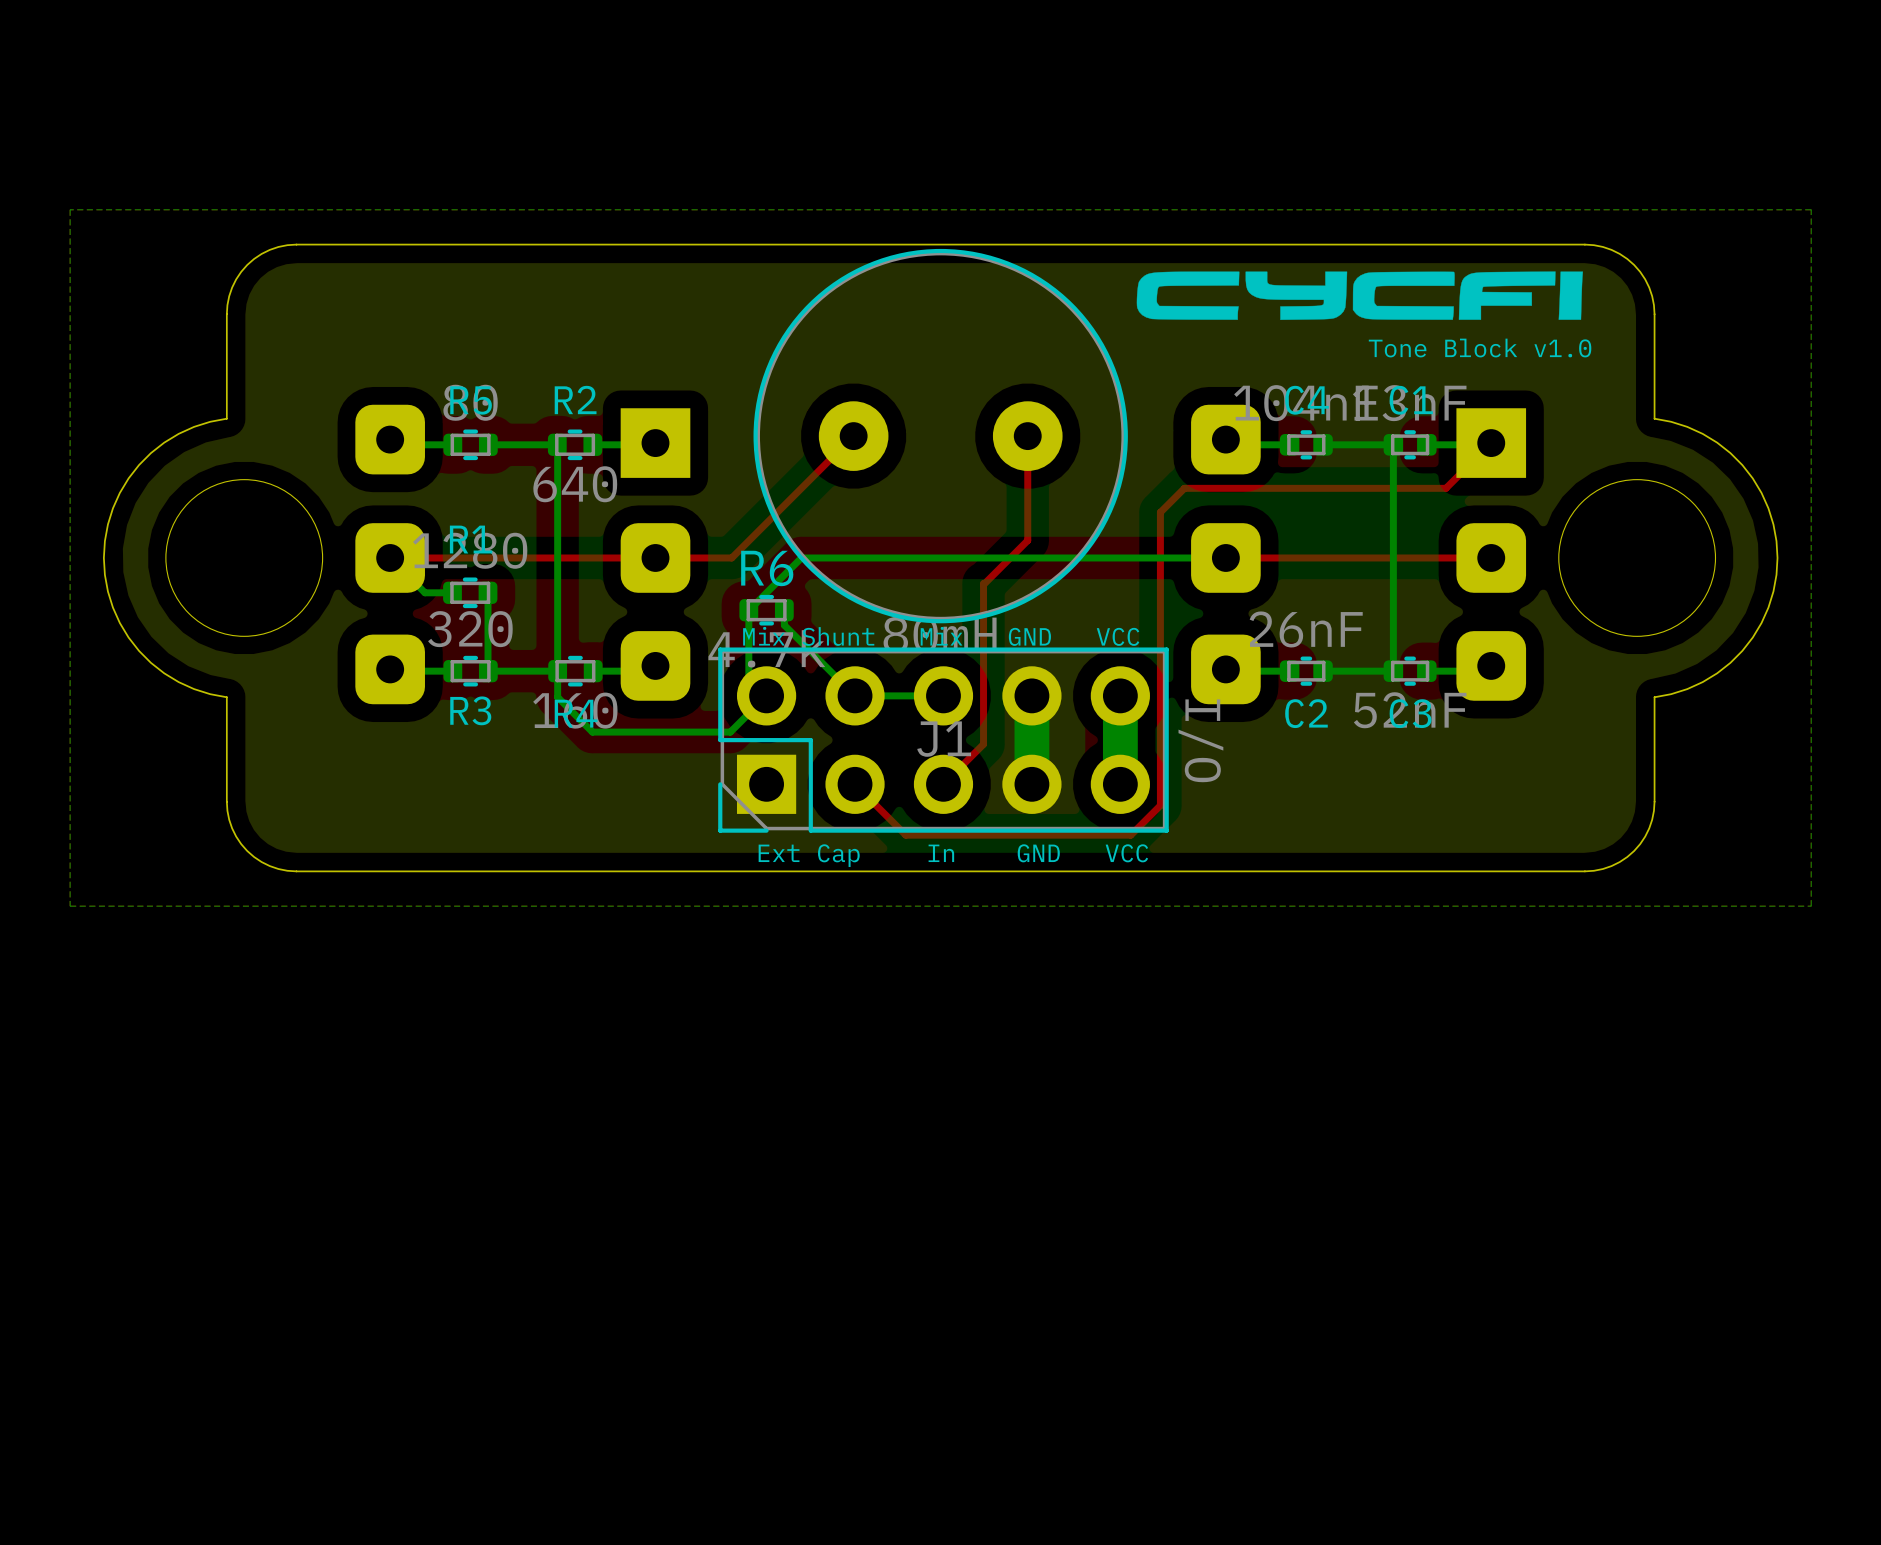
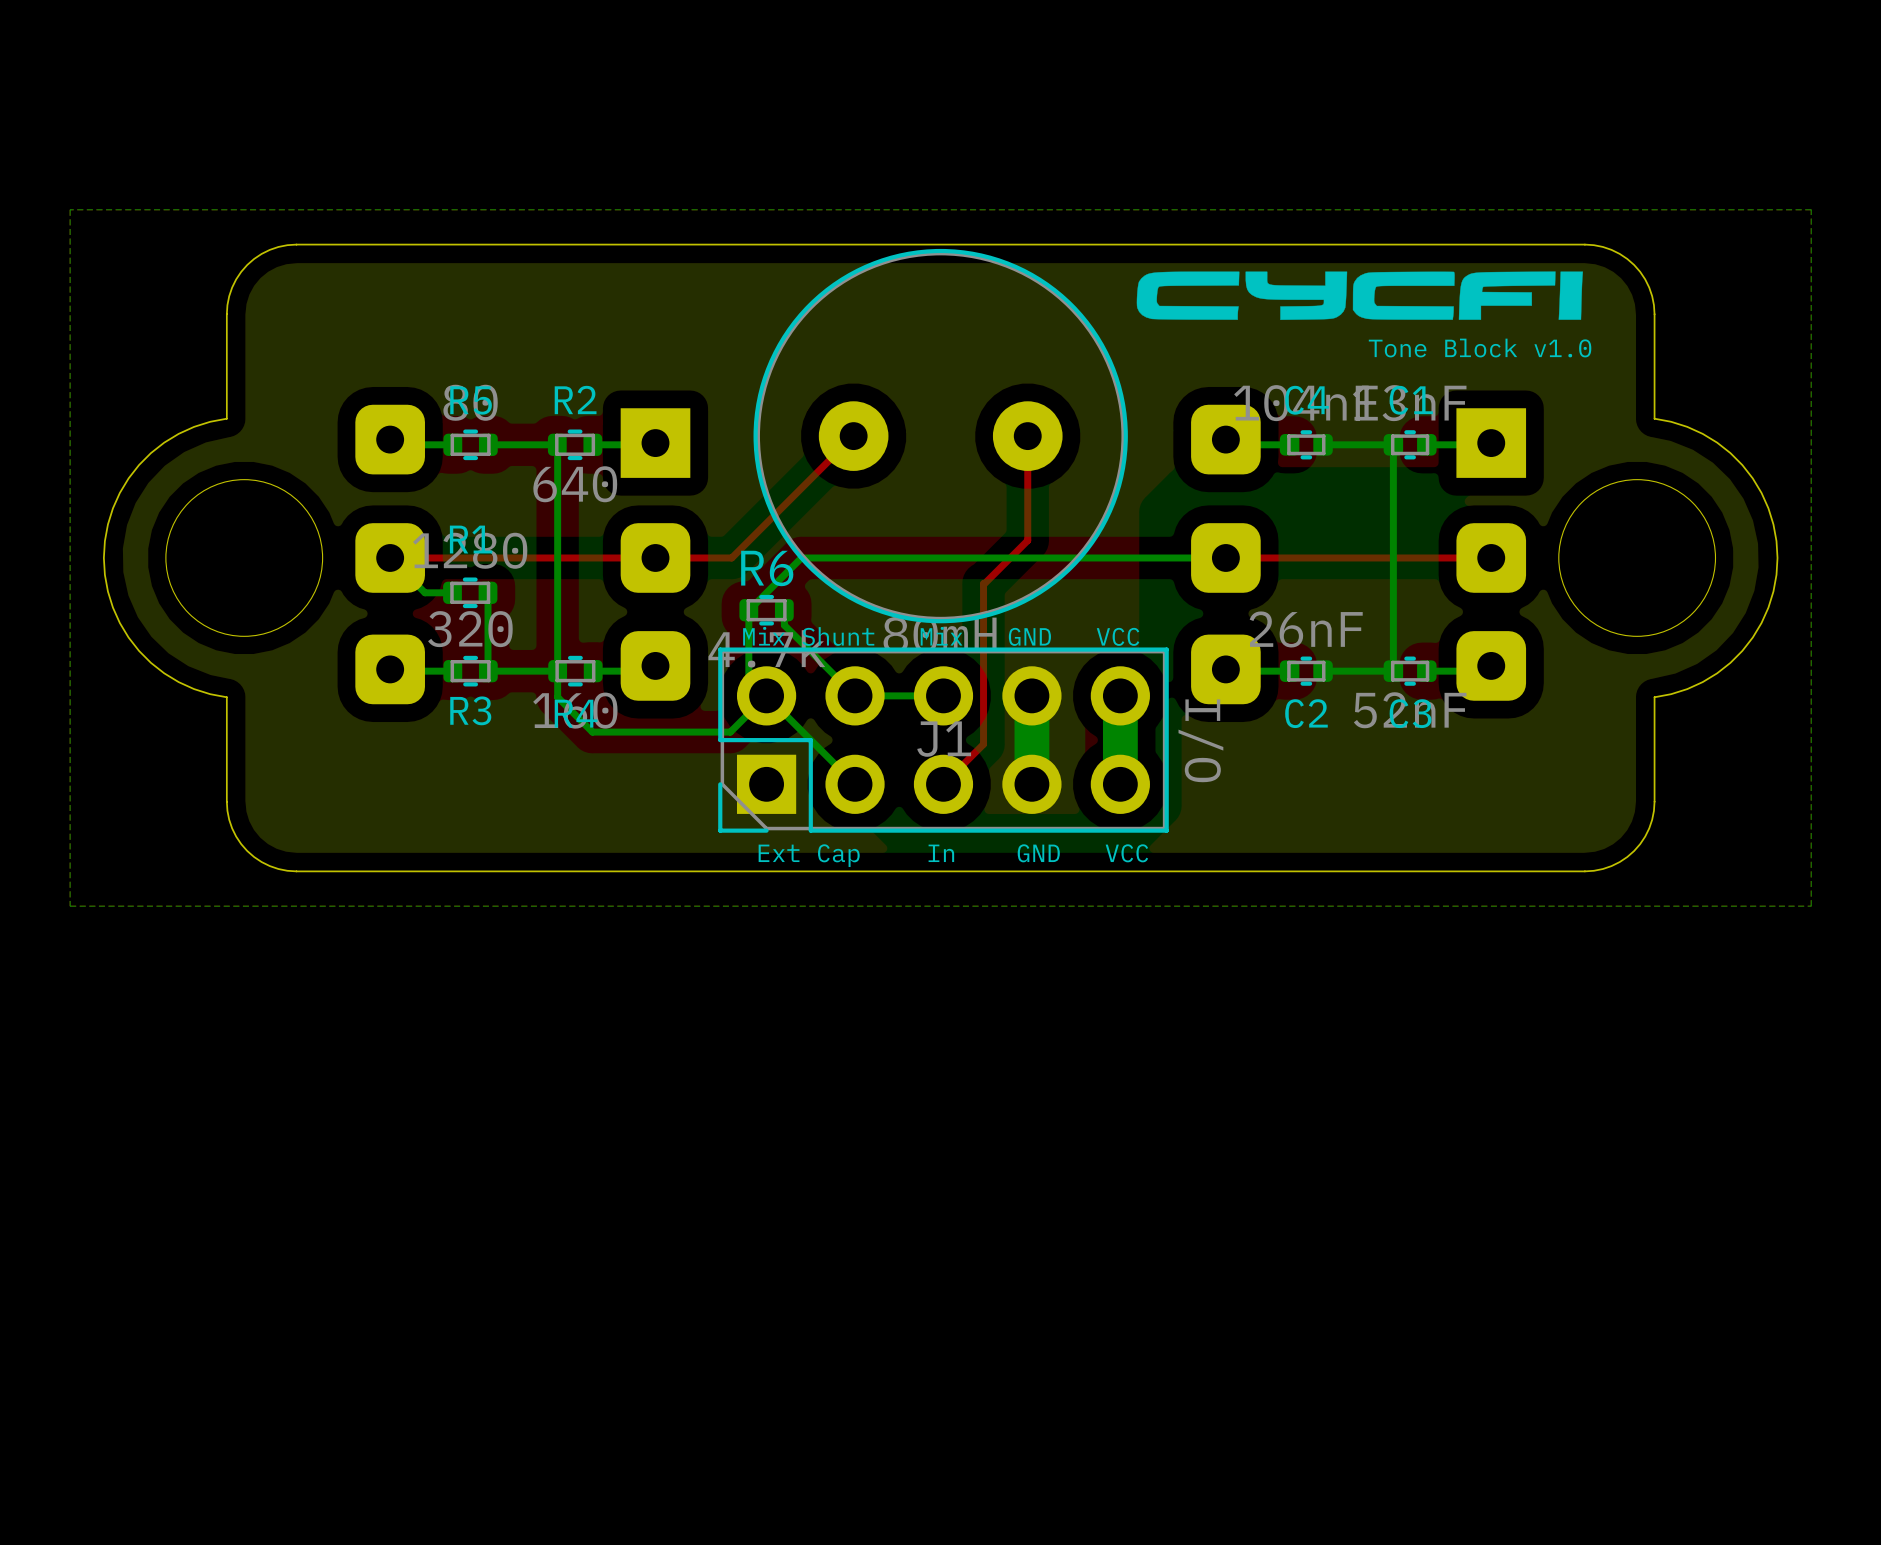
top track: (1491, 443) (1445, 488) (1184, 488) (1160, 512) (1160, 805) (1130, 835) (905, 835) (855, 784) -> none
bottom track: none -> (766, 695) (855, 784)

